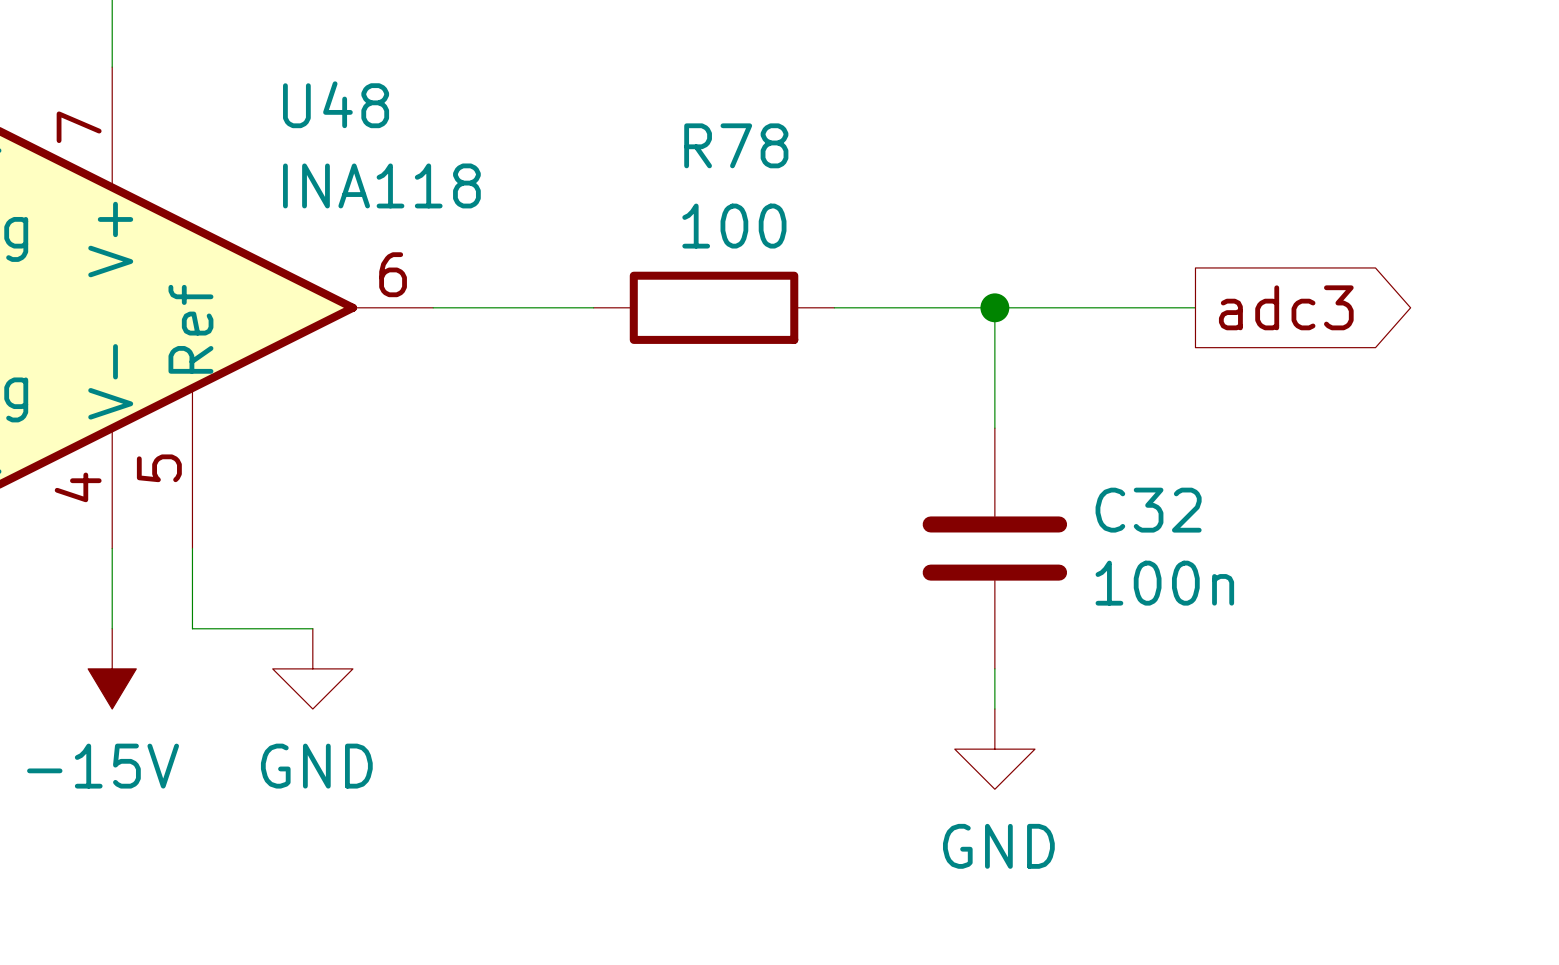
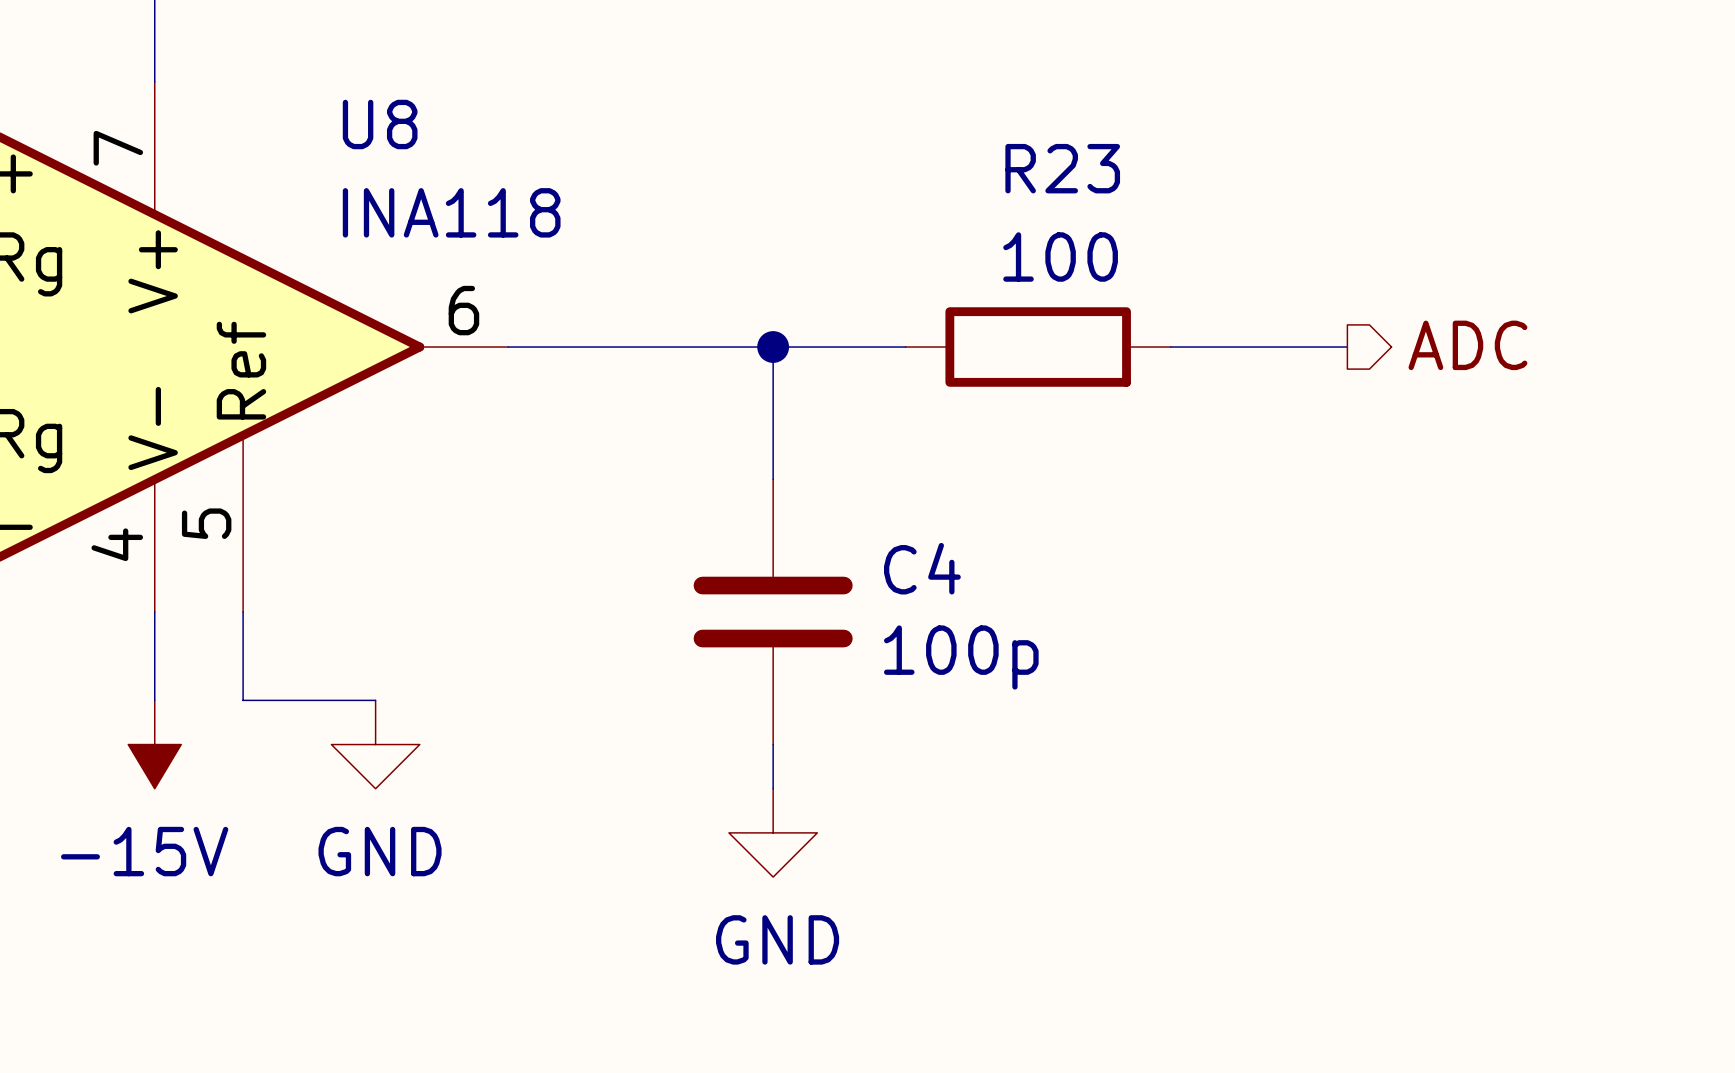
U48 name: U48 (336, 104) -> U8 (380, 124)
hierarchical label: none -> ADC (1467, 345)
junction: none -> (773, 347)
R78: 100 (714, 307) -> none
wire: (834, 307) (1035, 307) -> (684, 347) (905, 347)
R23: none -> 100 (1038, 347)
wire: (994, 307) (994, 428) -> (773, 347) (773, 479)
junction: (994, 307) -> none
global label: adc3 (1286, 307) -> none
C4: none -> 100p (773, 612)
C32: 100n (994, 548) -> none
wire: (994, 668) (994, 709) -> (773, 744) (773, 788)
power symbol position: GND (994, 749) -> GND (773, 832)

